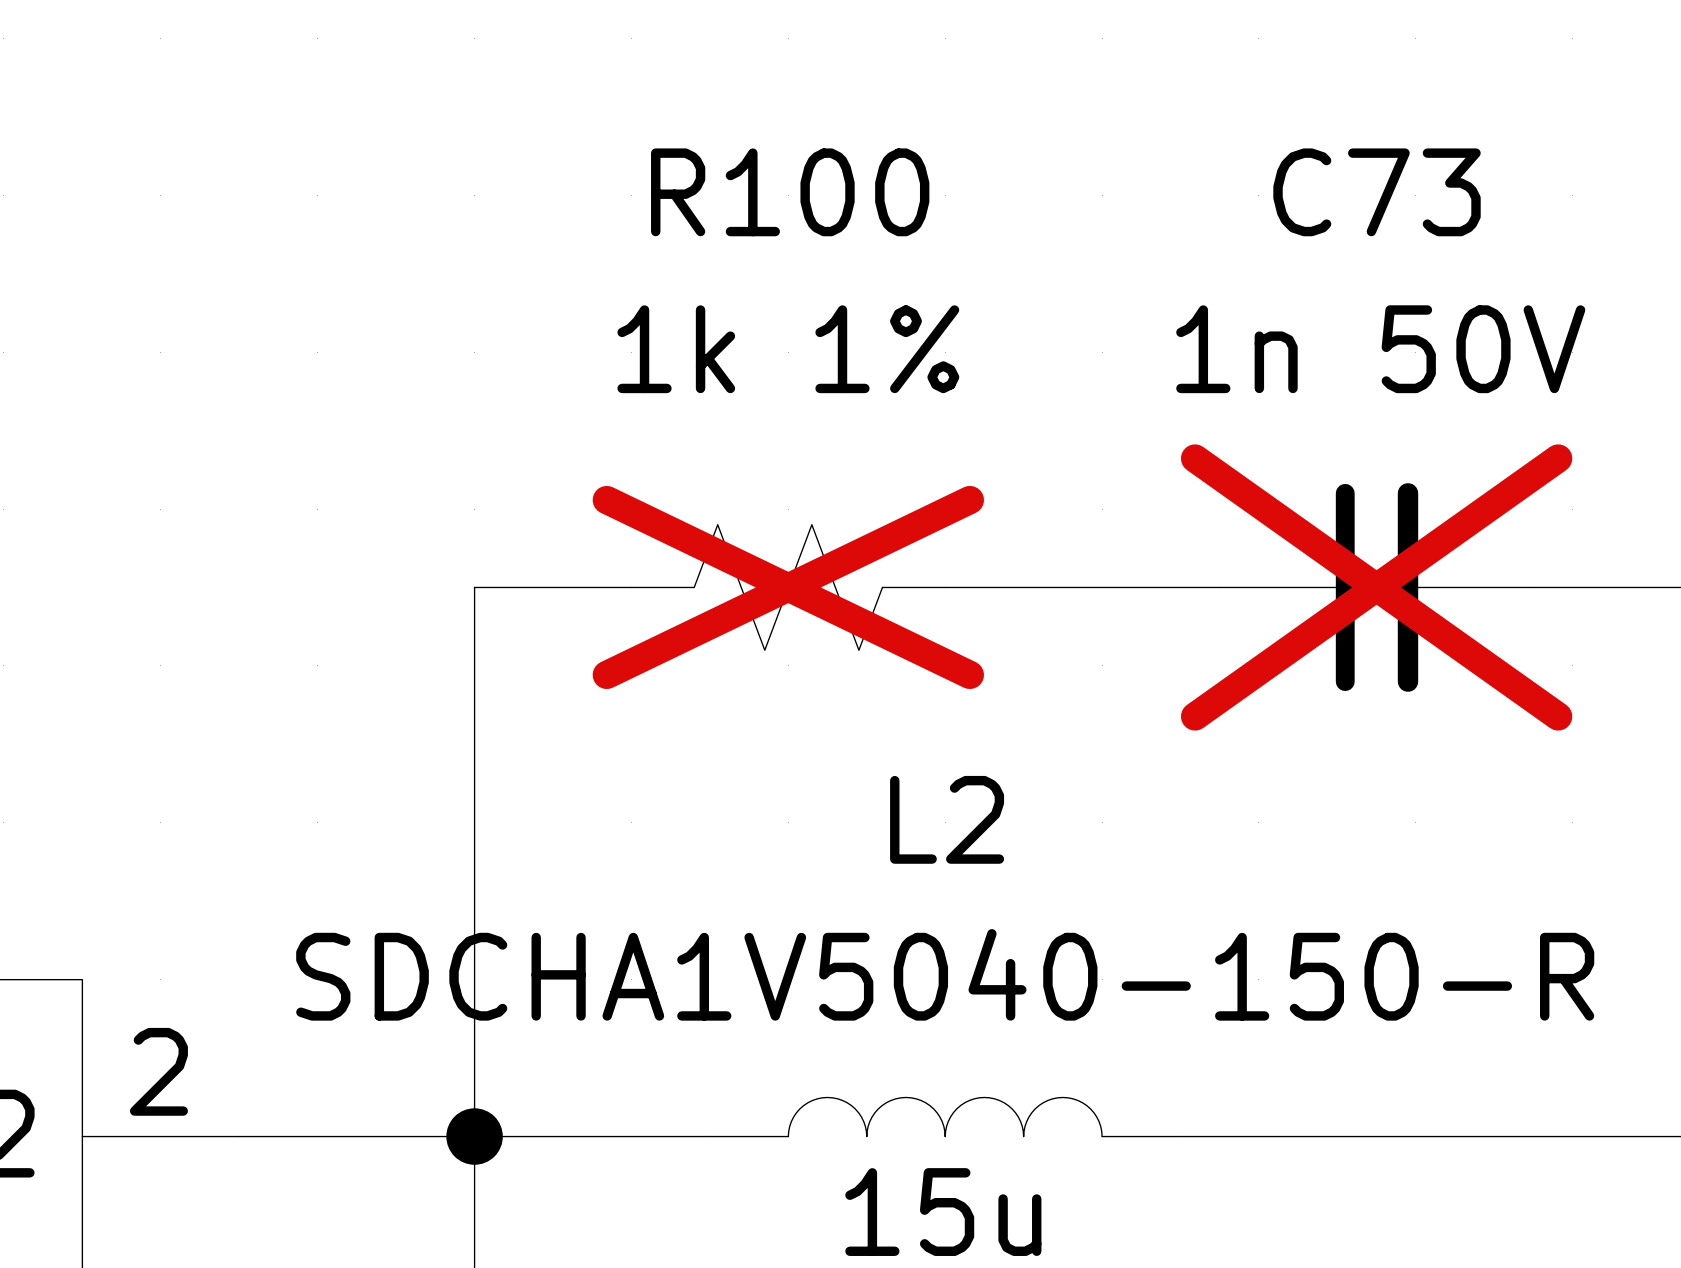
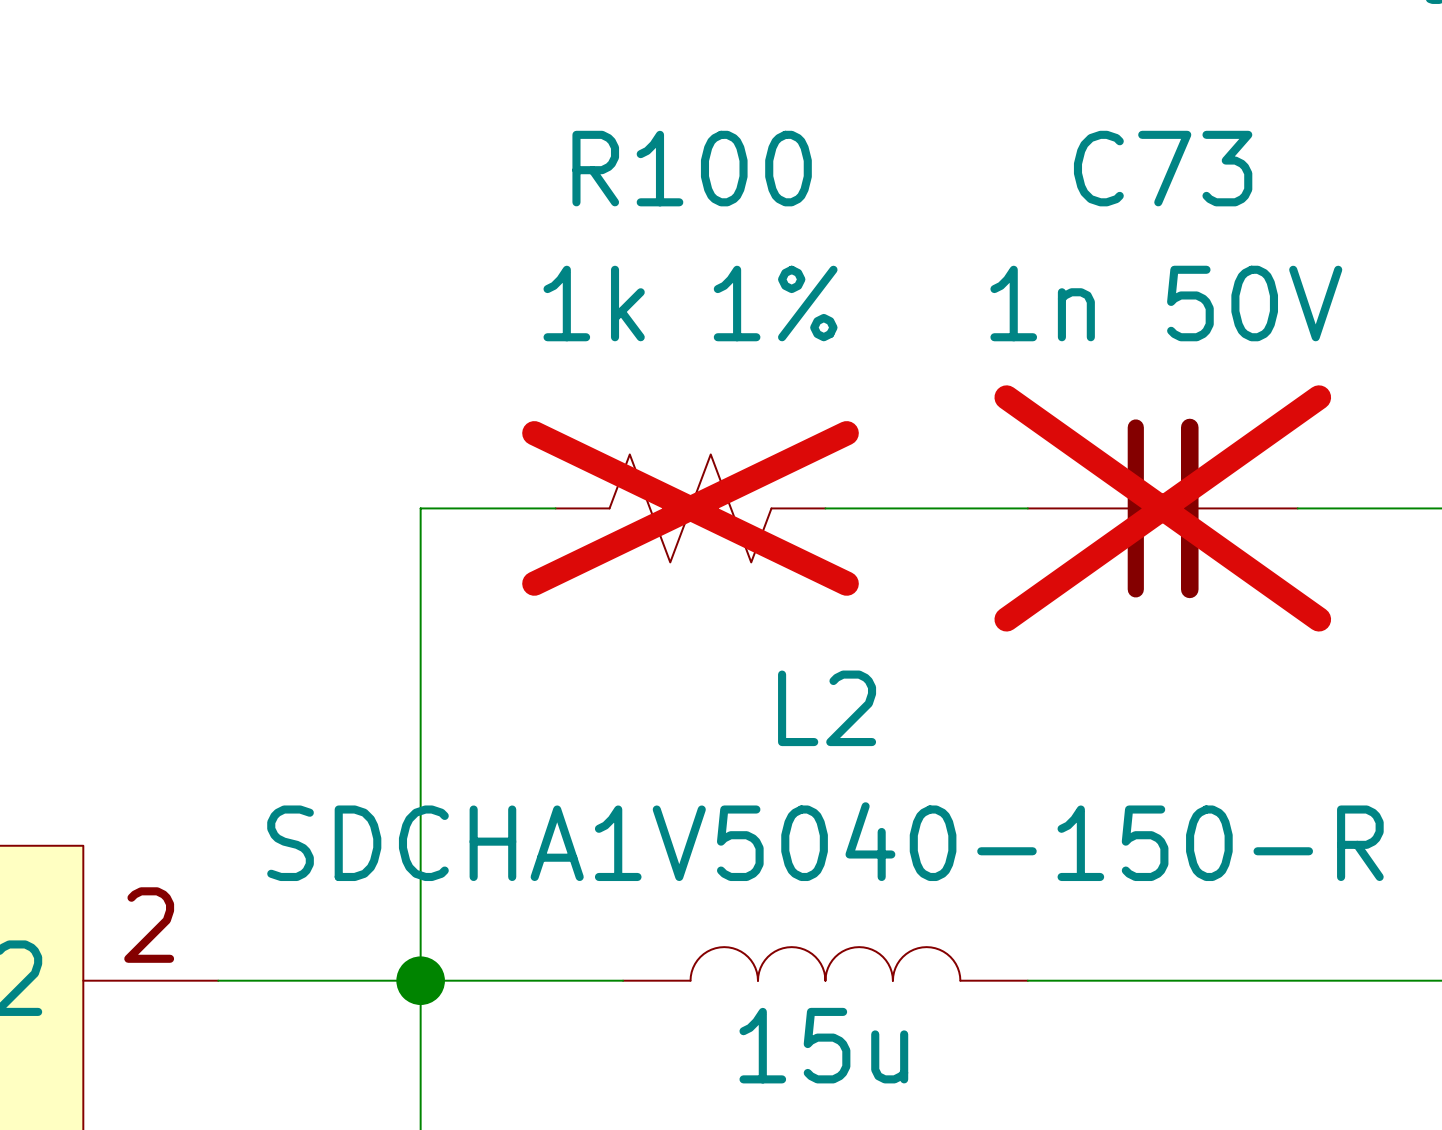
C73 position: (1376, 587) -> (1162, 508)

